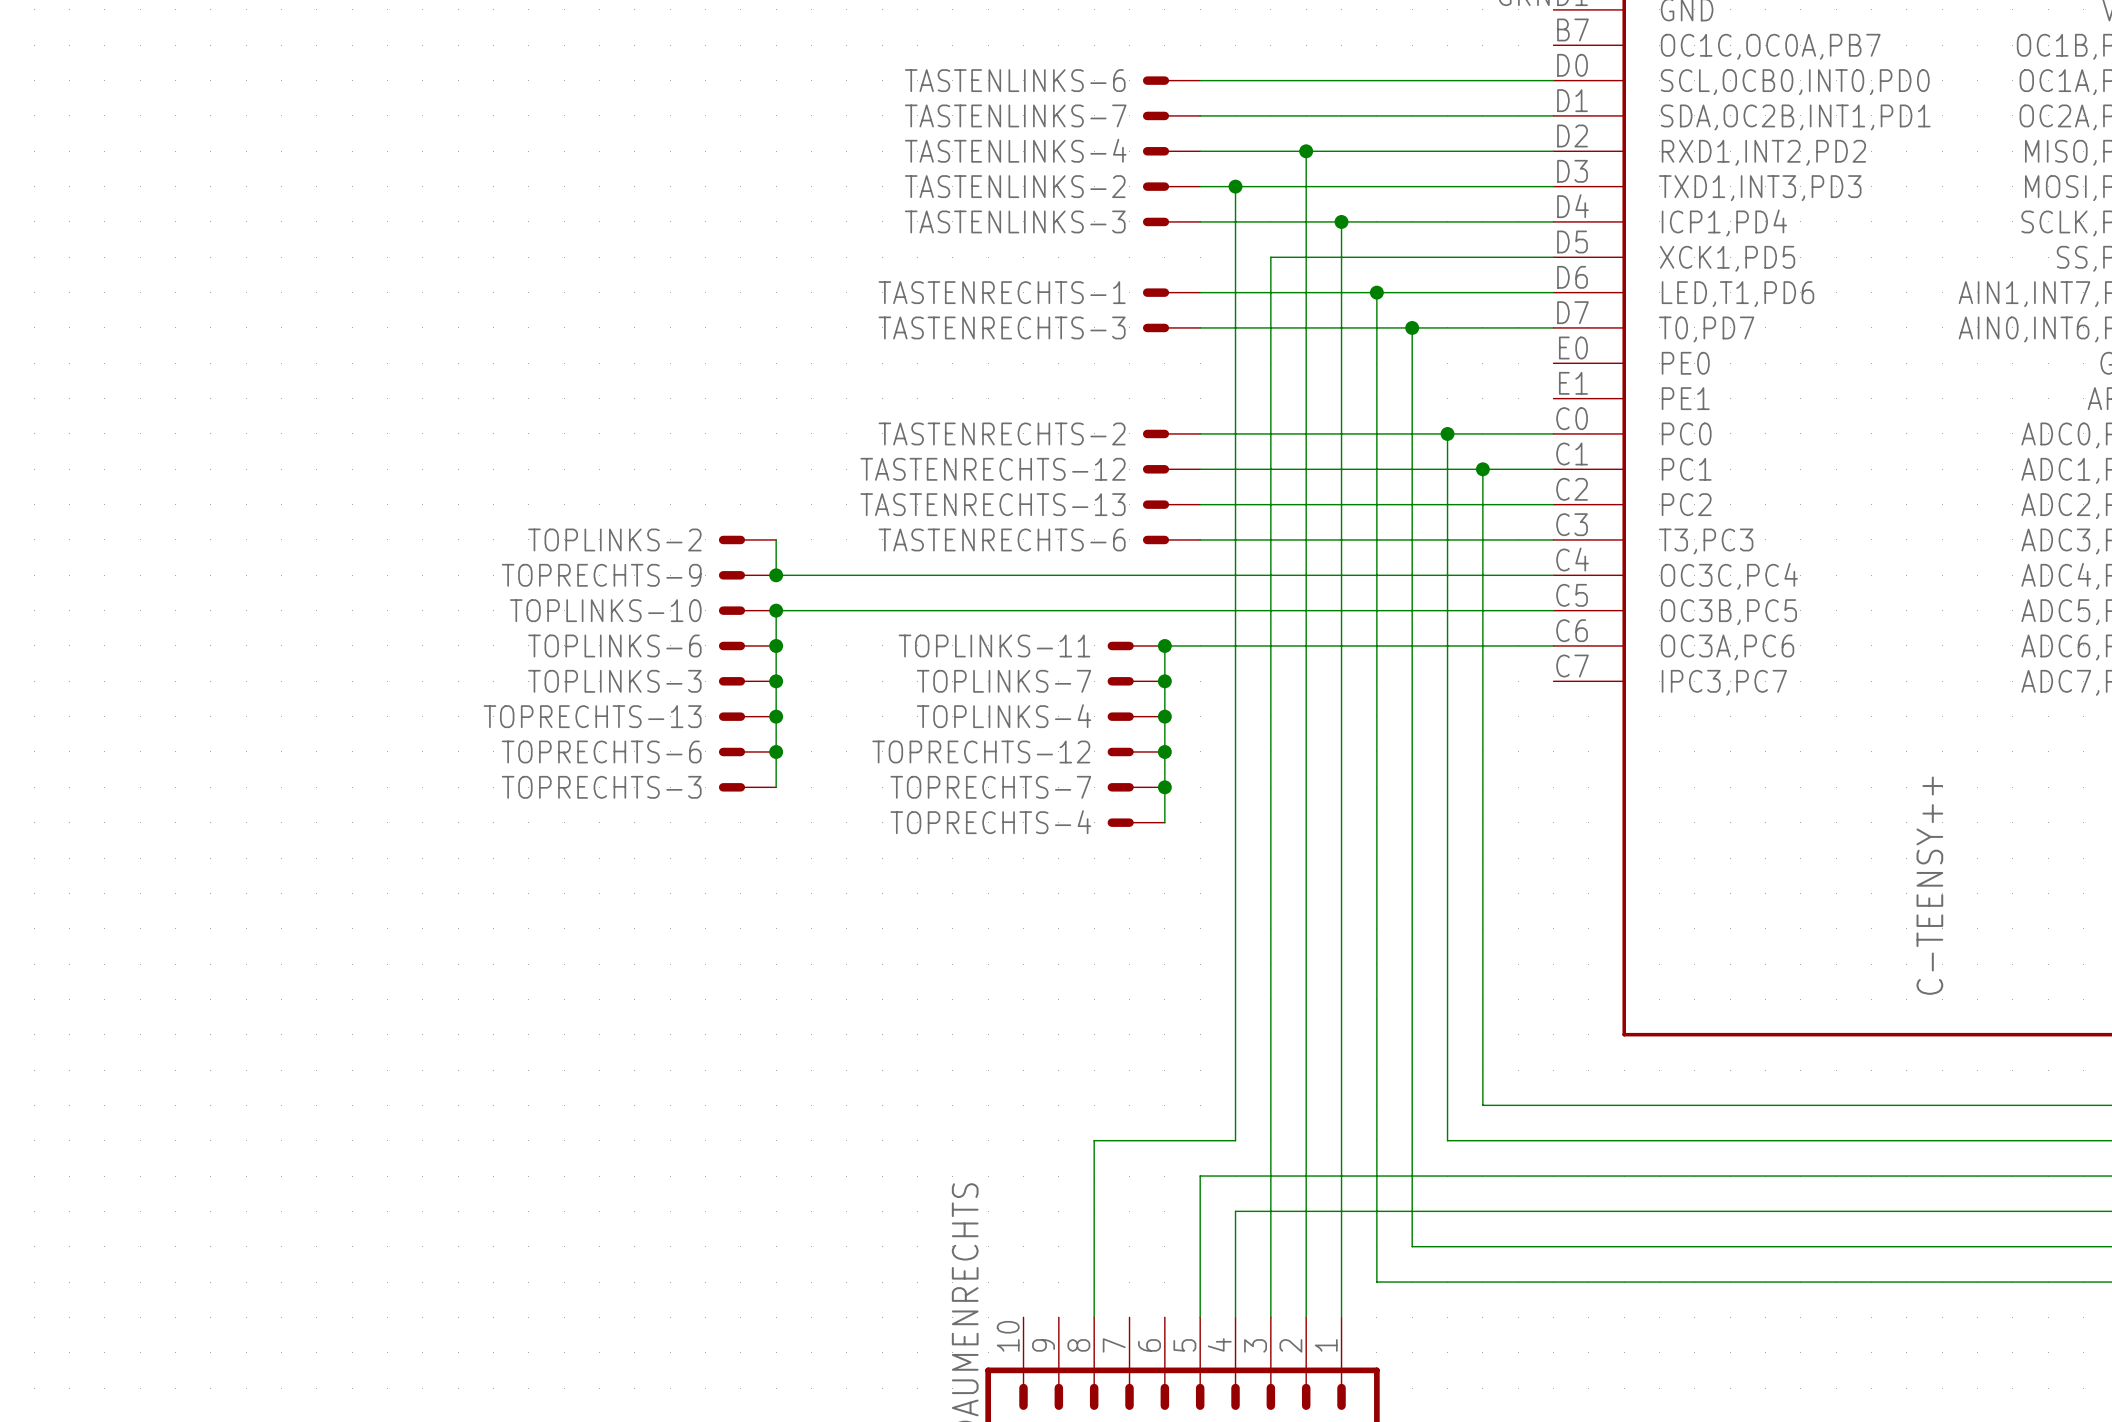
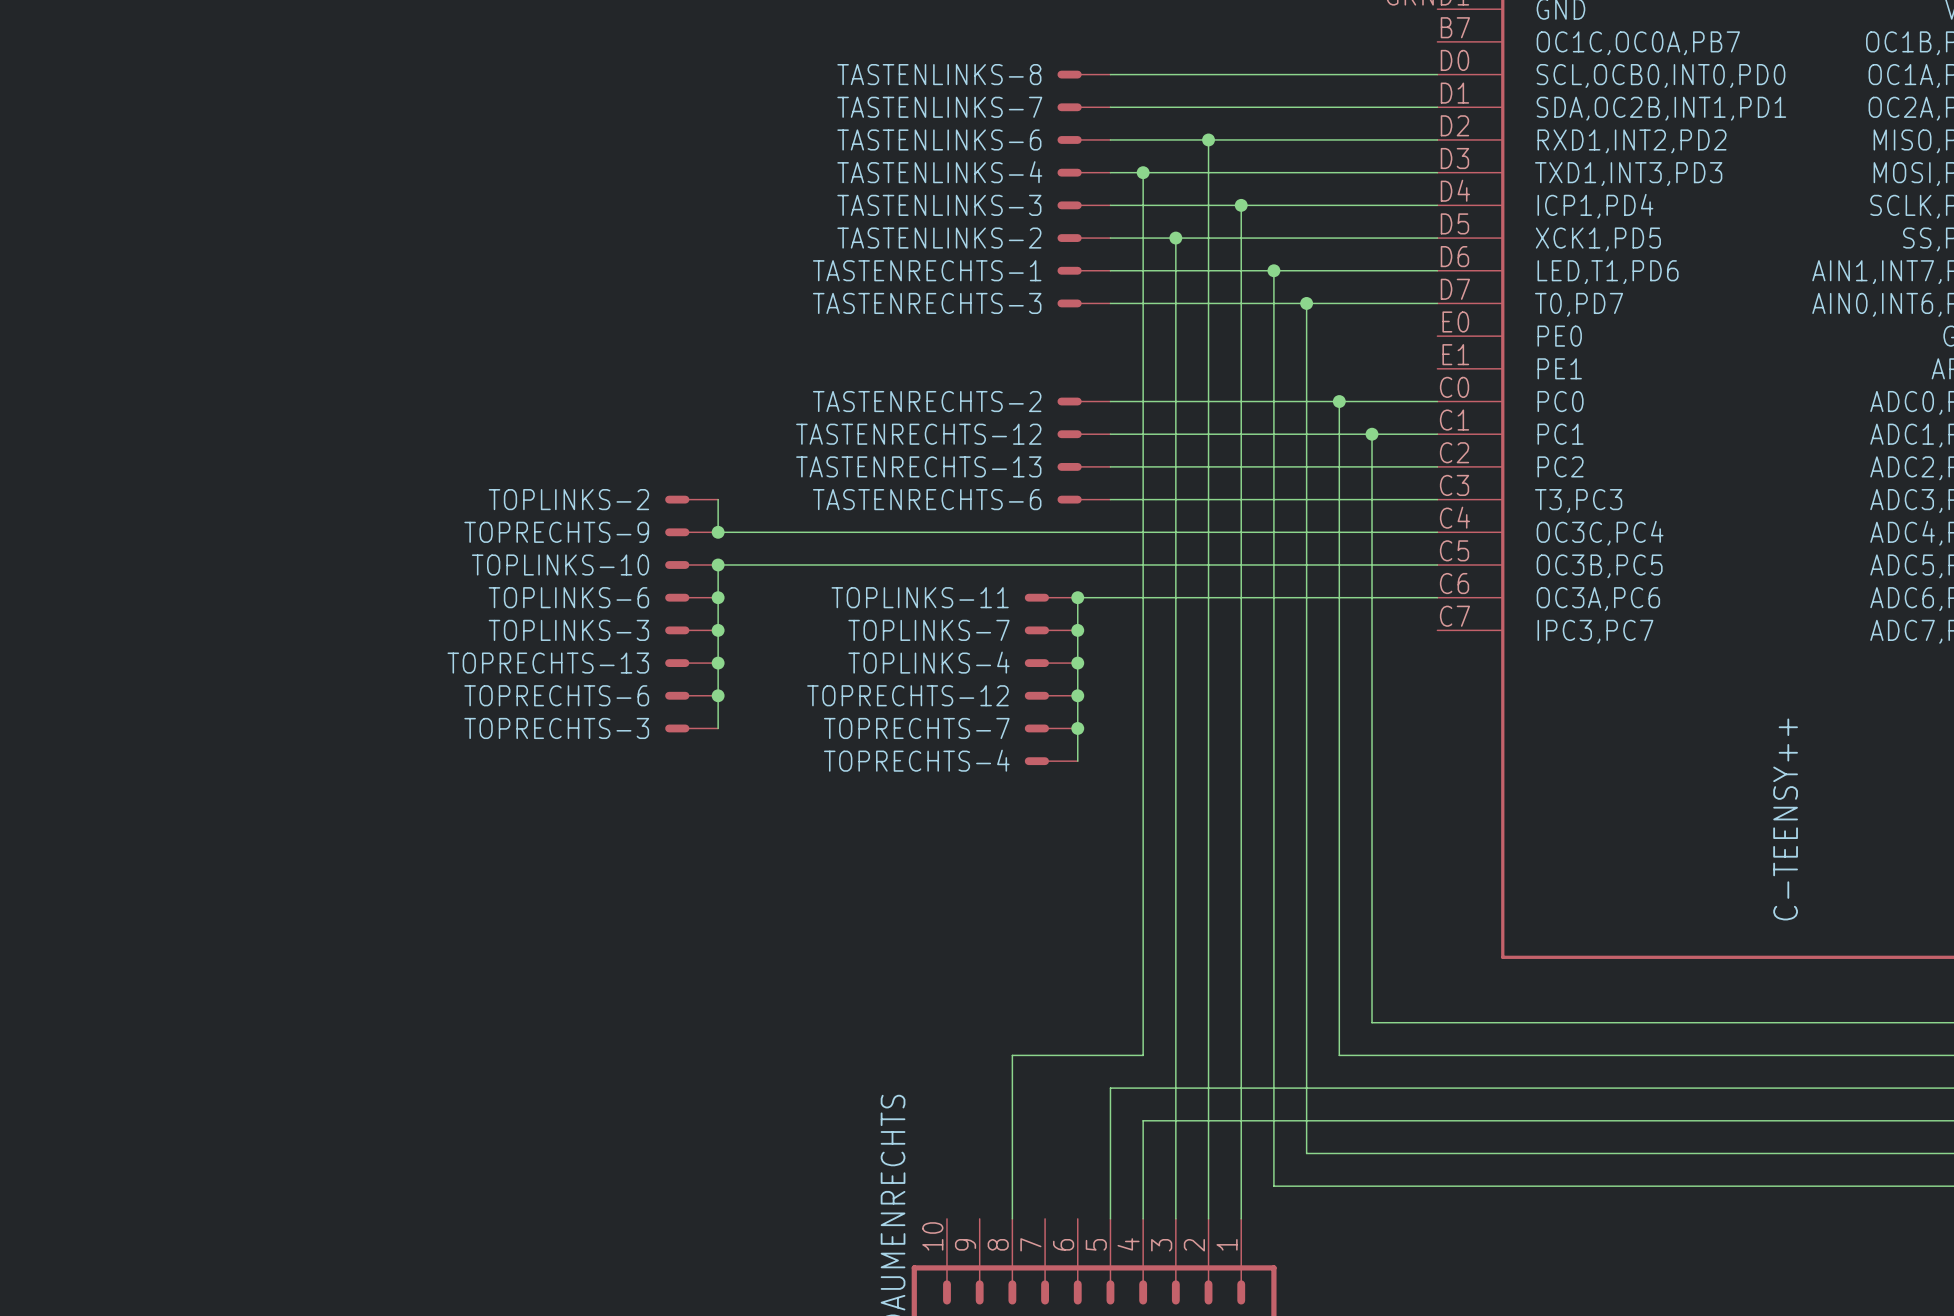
TASTENLINKS-6 name: TASTENLINKS-6 (1015, 80) -> TASTENLINKS-8 (939, 74)
TASTENLINKS-4 name: TASTENLINKS-4 (1015, 150) -> TASTENLINKS-6 (939, 139)
TASTENLINKS-2 name: TASTENLINKS-2 (1015, 186) -> TASTENLINKS-4 (939, 172)
TASTENLINKS-2: none -> (1083, 238)
wire: none -> (1110, 238) (1175, 238)
junction: none -> (1175, 238)

